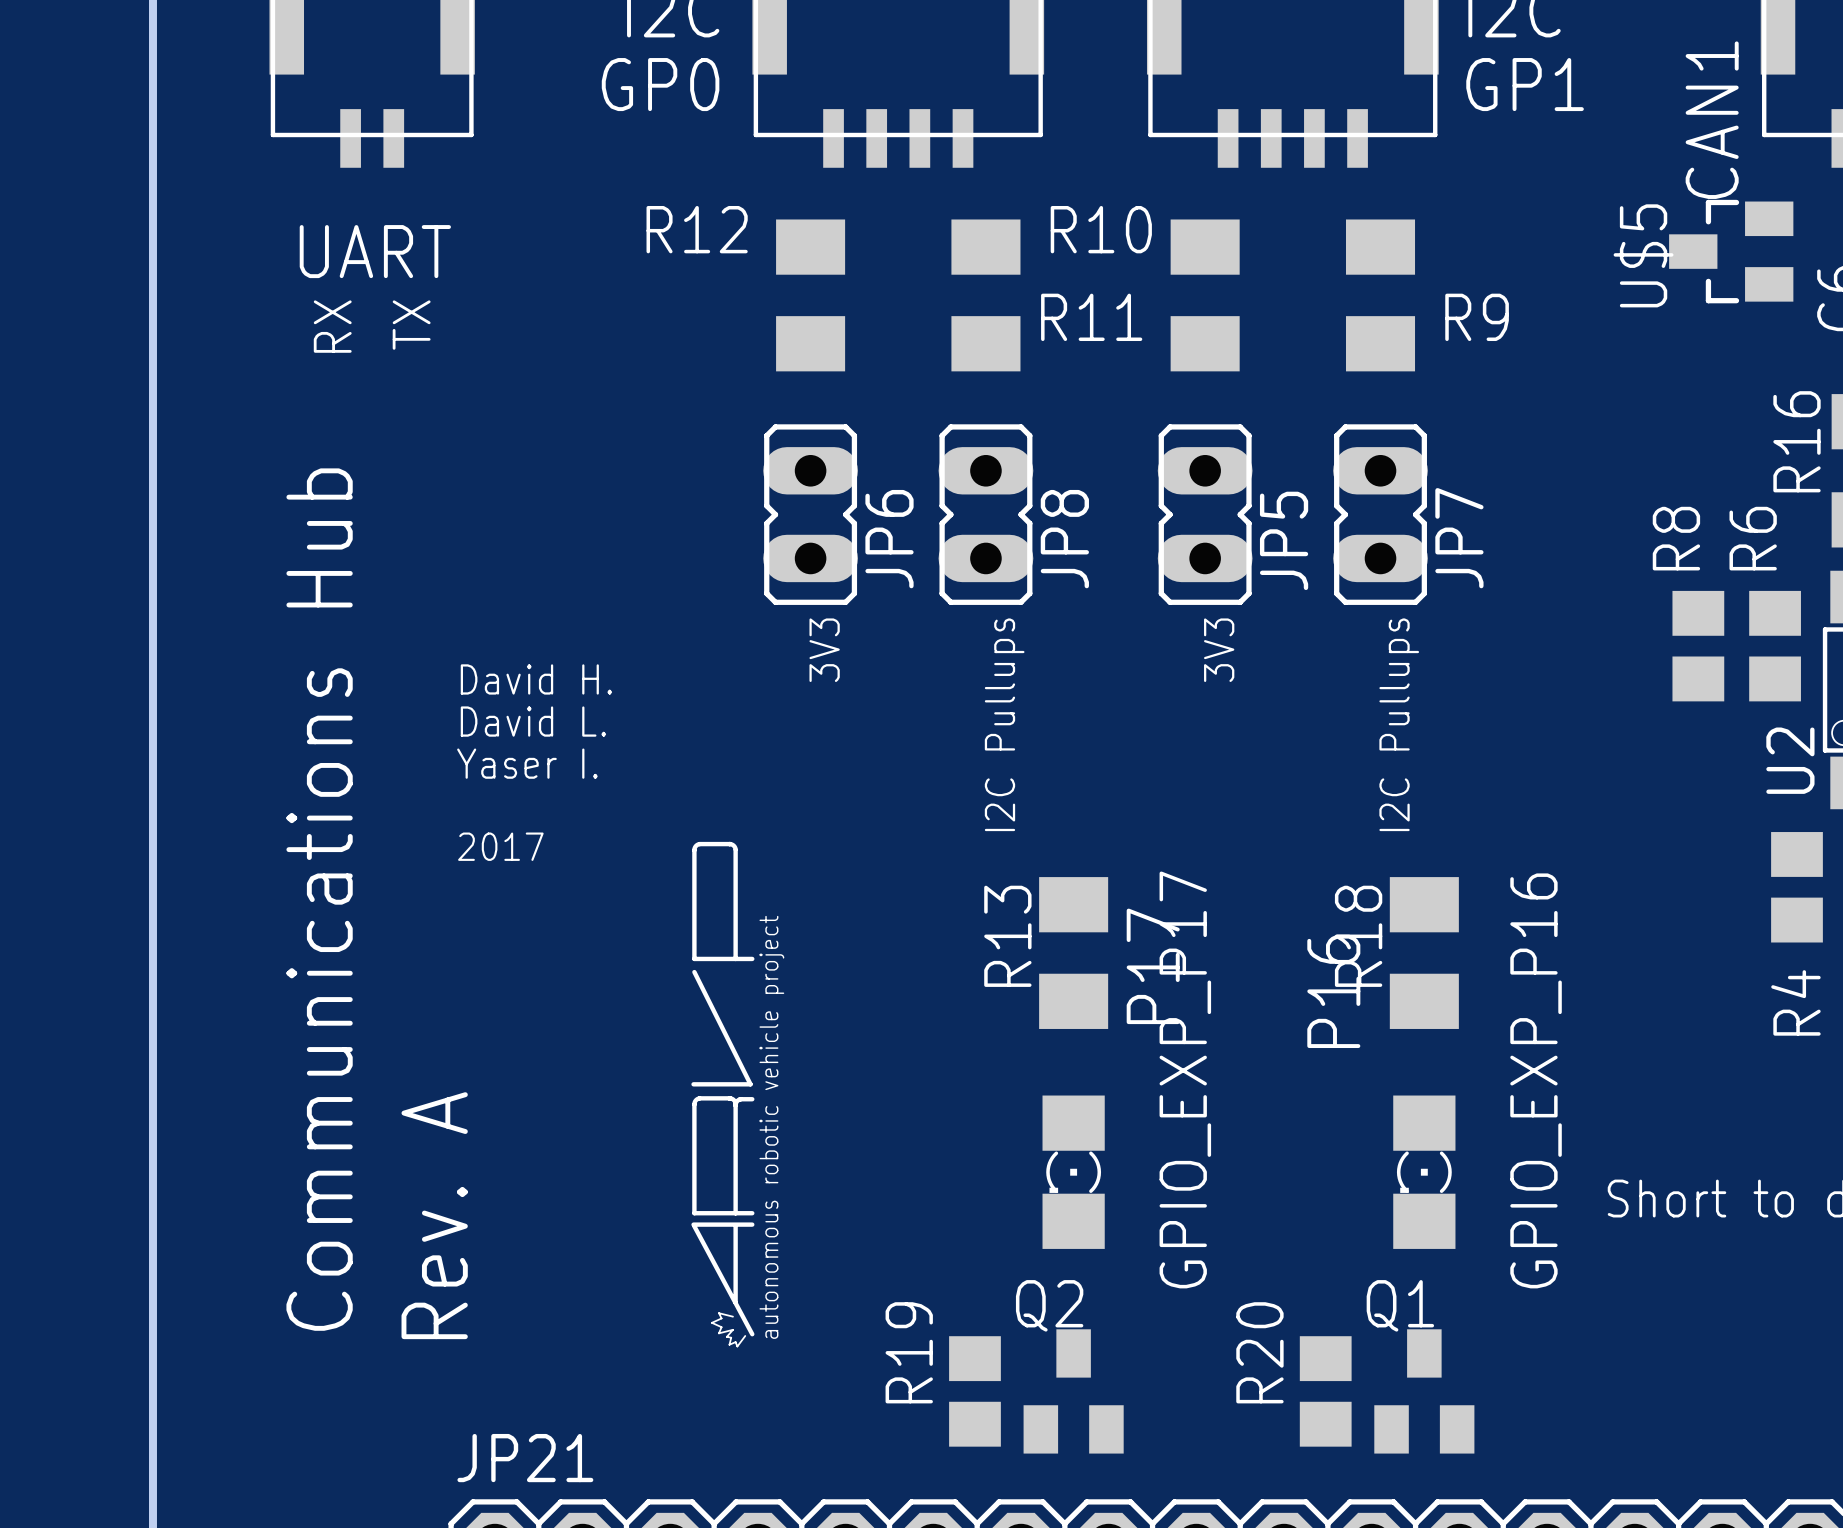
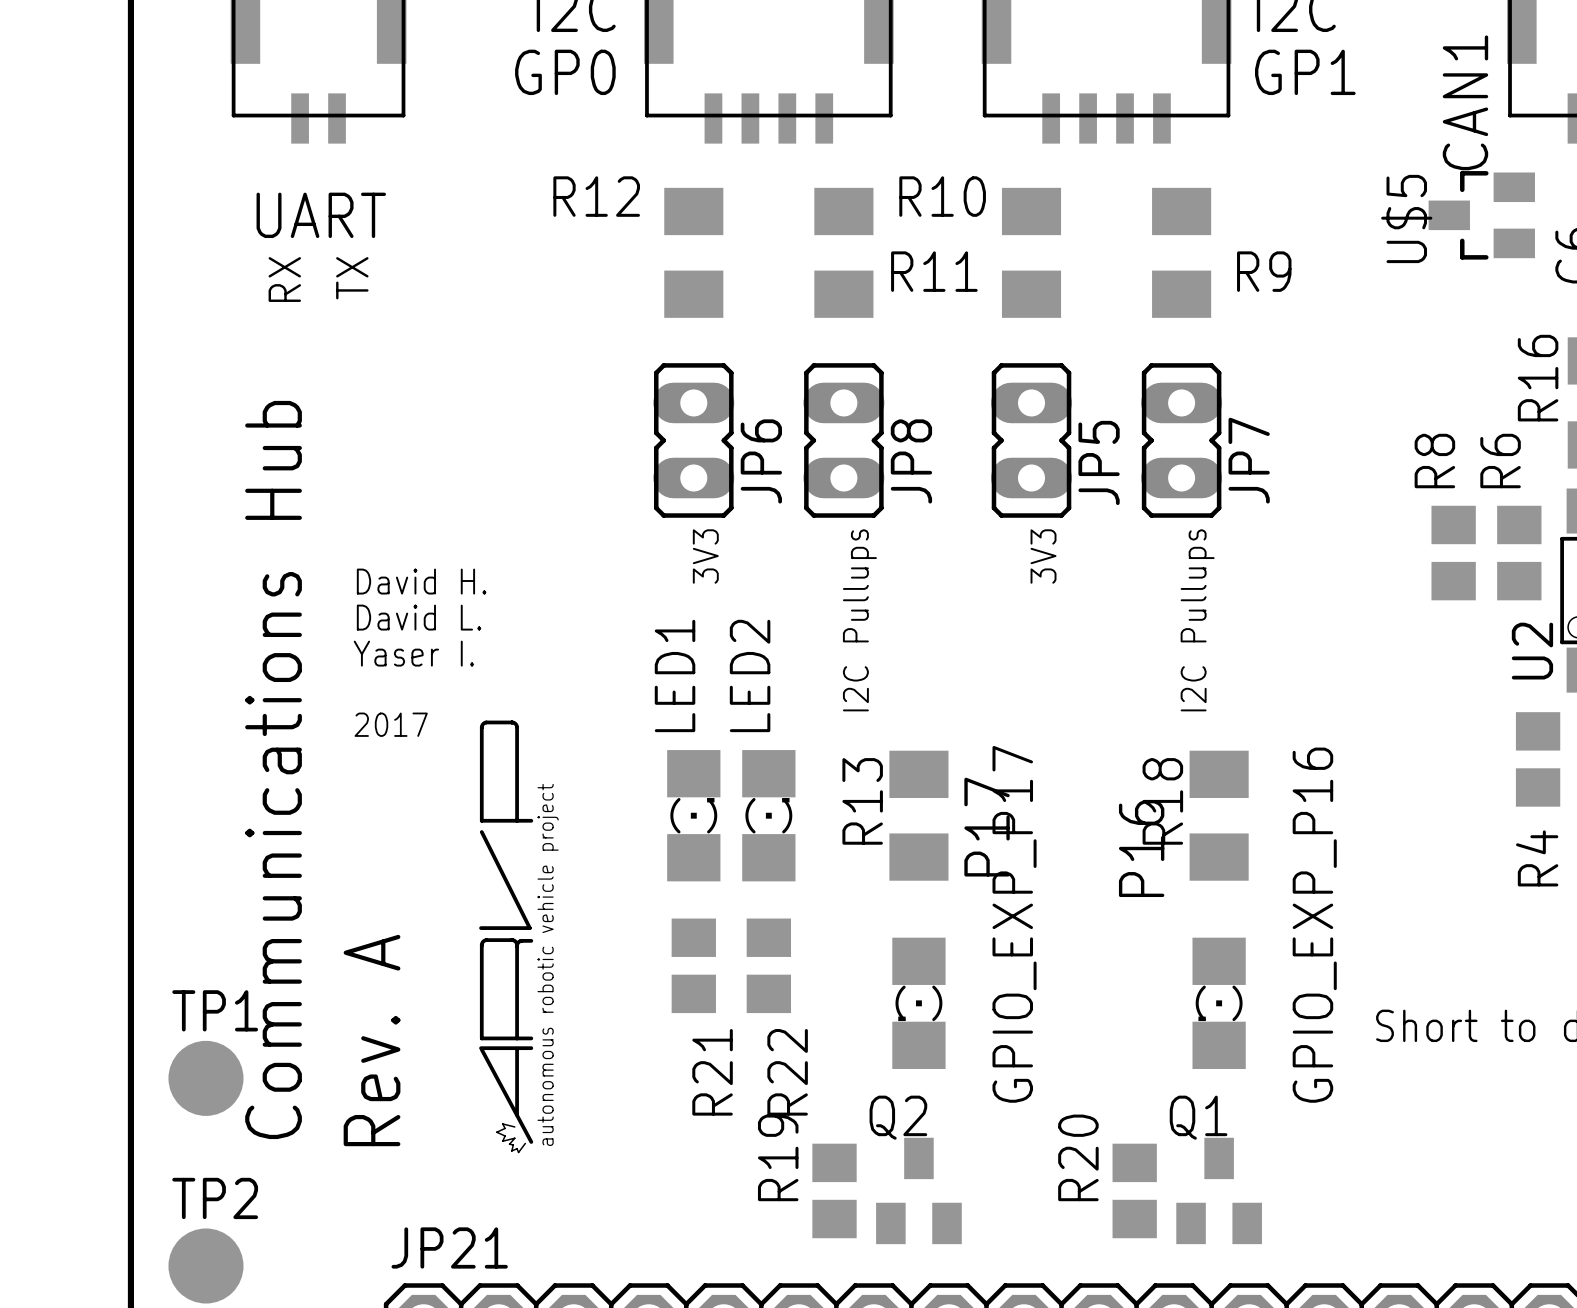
text position: David H. (536, 679) -> David H. (421, 581)
text position: David L. (533, 721) -> David L. (419, 617)
text position: Yaser I. (527, 763) -> Yaser I. (413, 653)
text position: 2017 (500, 846) -> 2017 (391, 724)
LED1: none -> (693, 815)
LED2: none -> (768, 815)
drawing position: (722, 1094) -> (506, 936)
R21: none -> (693, 965)
R22: none -> (768, 965)
TP1: none -> (205, 1078)
TP2: none -> (205, 1265)

